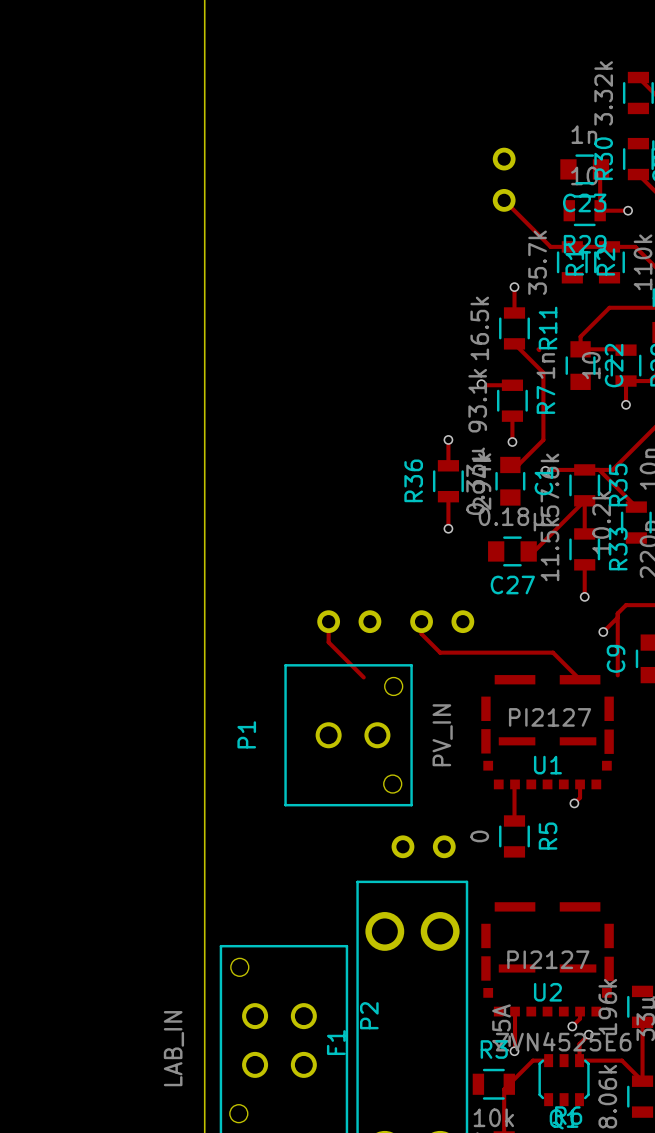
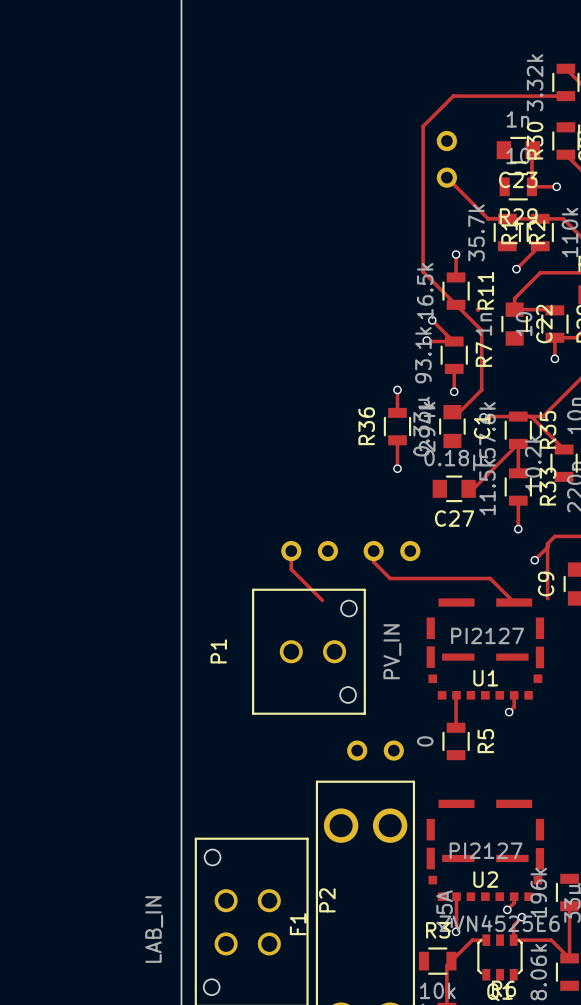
track: none -> (565, 96) (453, 96) (423, 126) (423, 271) (456, 304)
track: none -> (540, 246) (516, 269)
via: none -> (516, 269)
track: none -> (432, 320) (453, 341)
via: none -> (432, 320)

